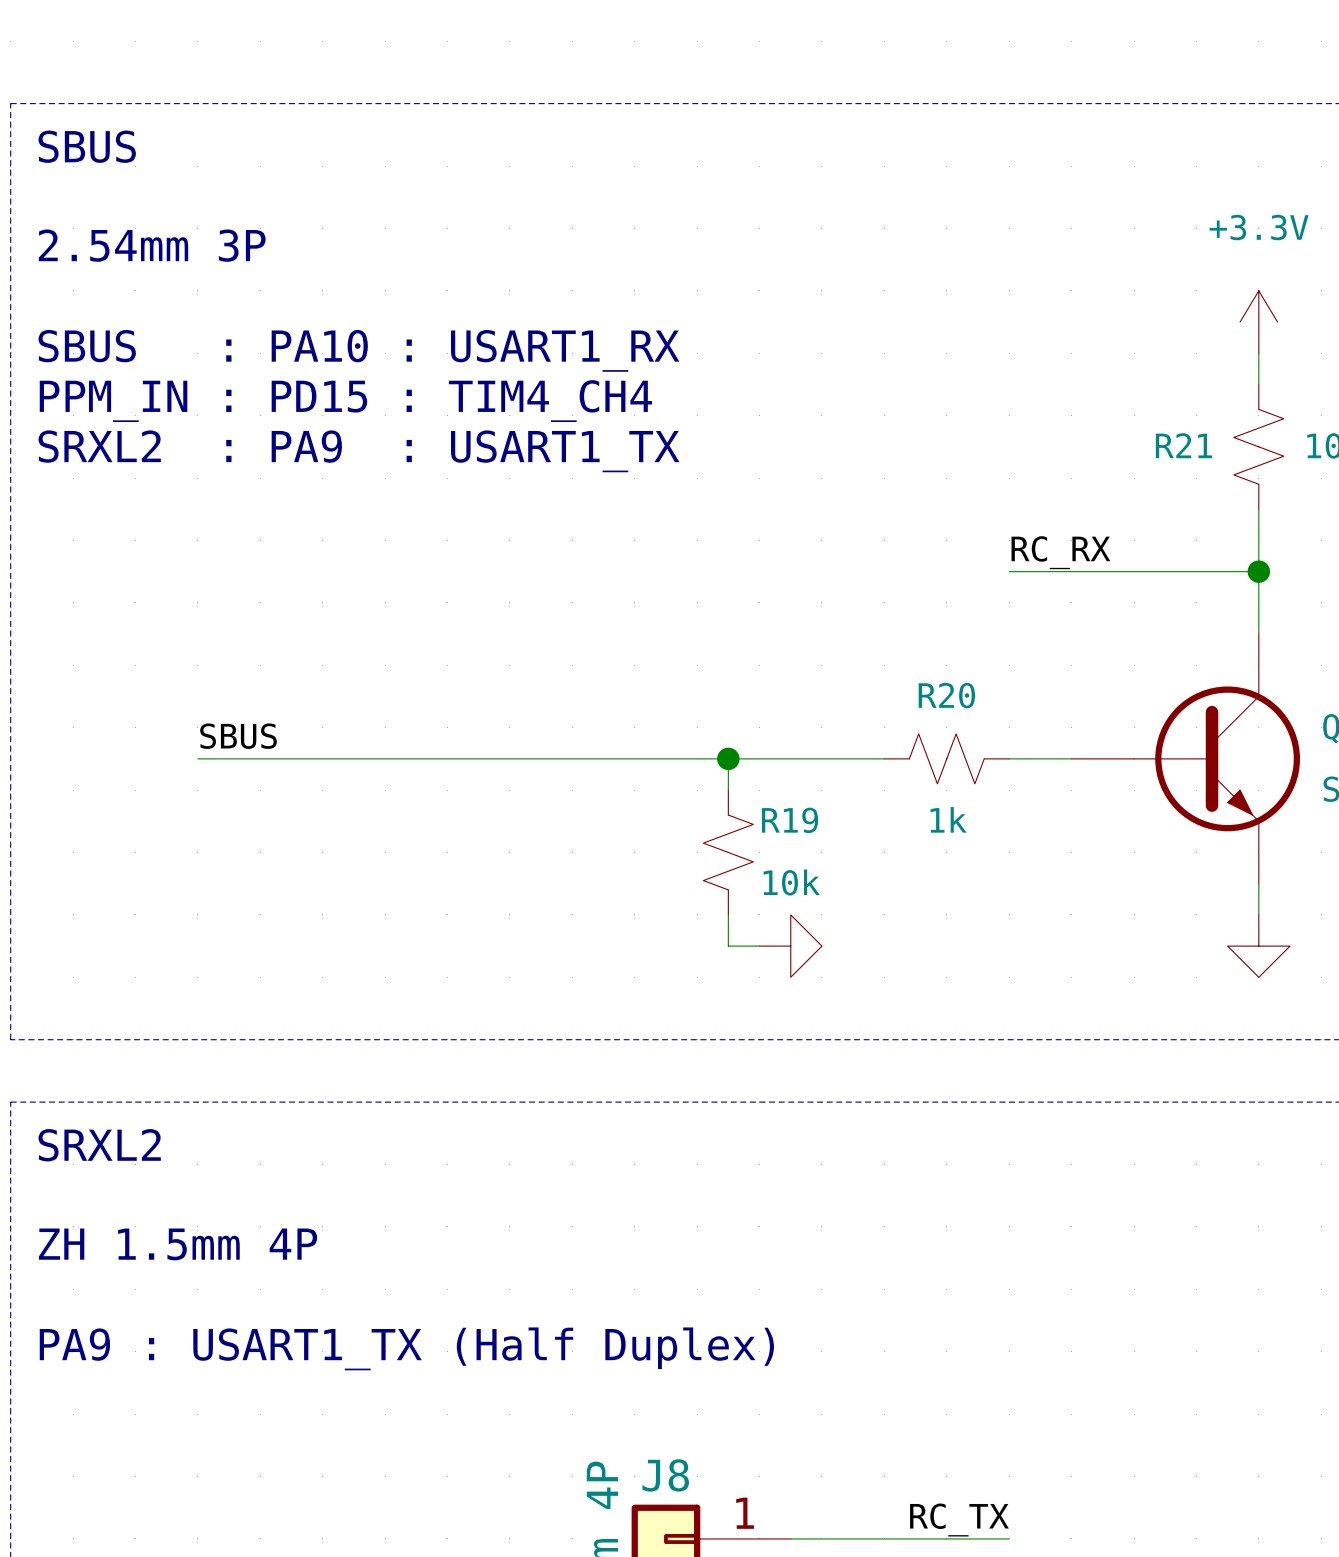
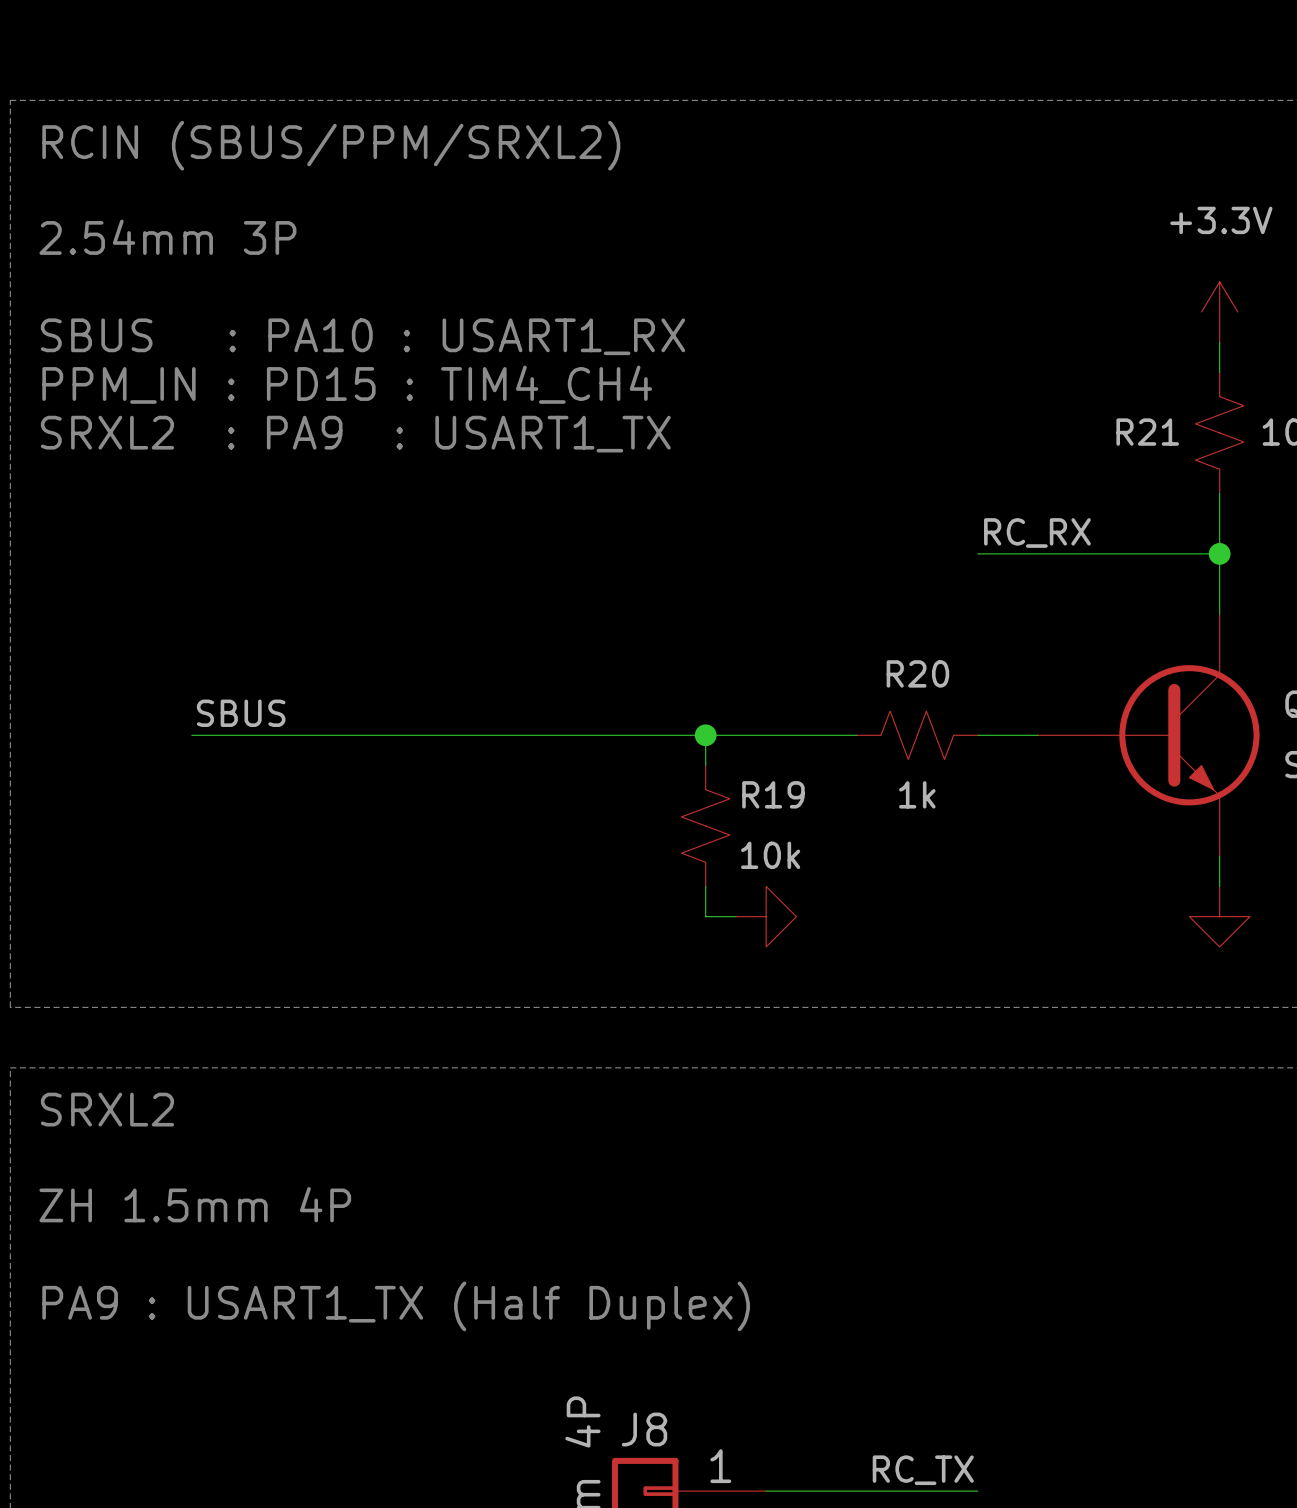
text: SBUS (87, 146) -> RCIN (SBUS/PPM/SRXL2) (331, 145)

